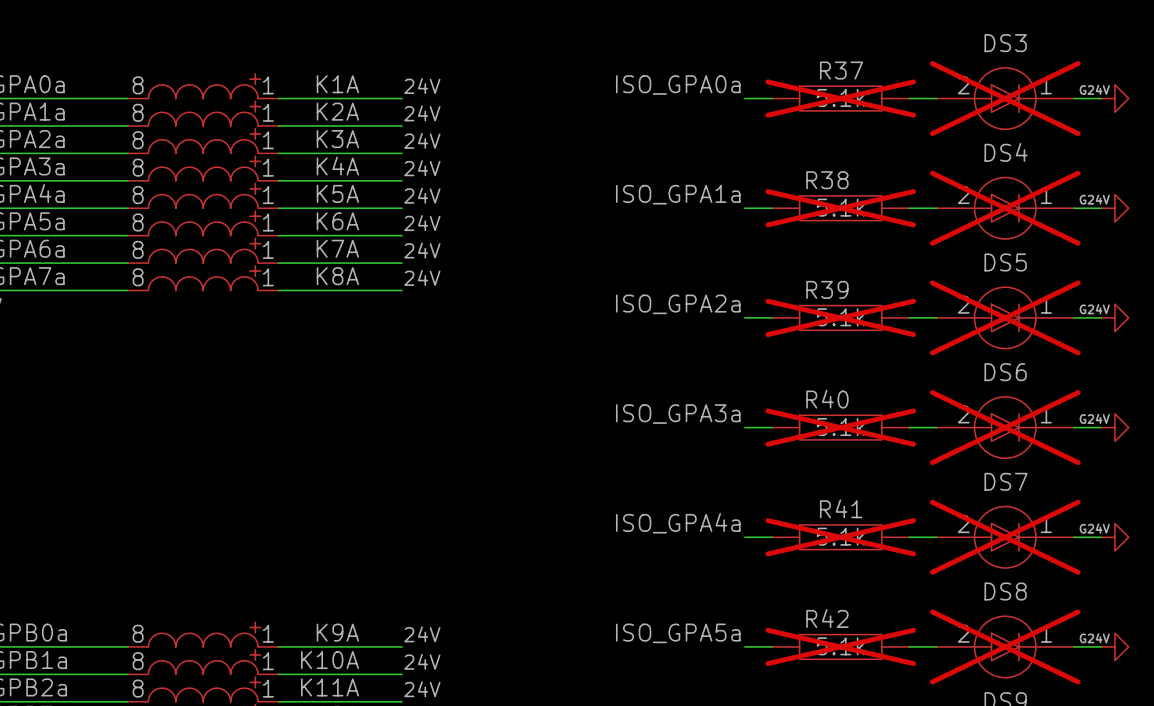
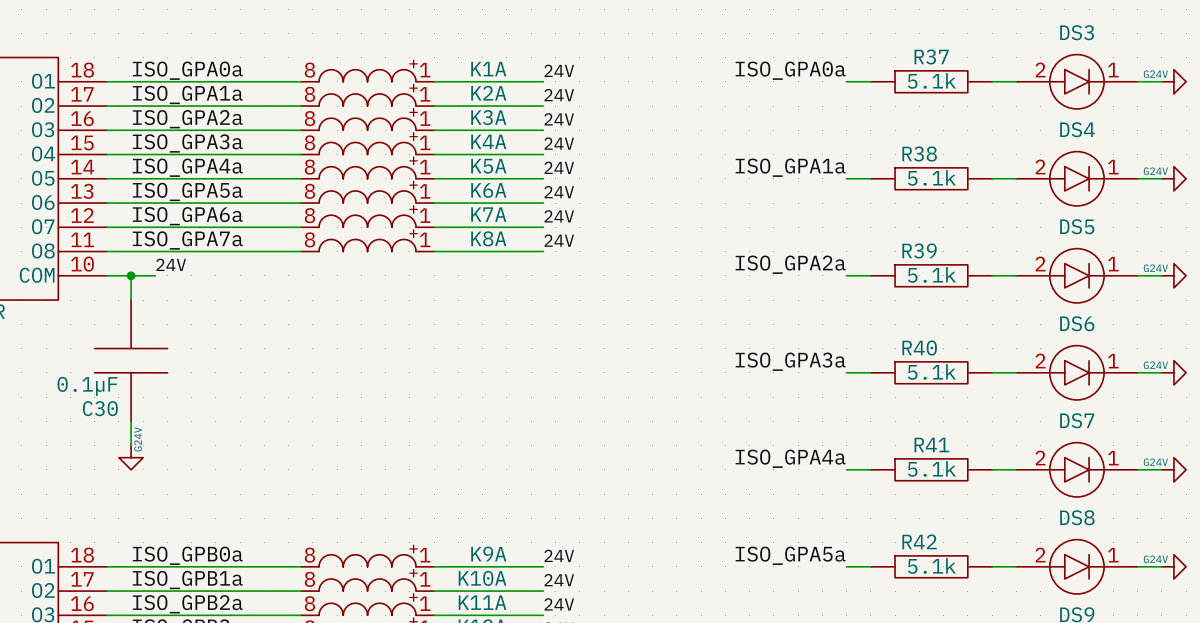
R37 do-not-place cross: (840, 98) -> none
DS3 do-not-place cross: (1005, 98) -> none
R38 do-not-place cross: (840, 208) -> none
DS4 do-not-place cross: (1005, 208) -> none
R39 do-not-place cross: (840, 317) -> none
DS5 do-not-place cross: (1005, 317) -> none
R40 do-not-place cross: (840, 427) -> none
DS6 do-not-place cross: (1005, 427) -> none
R41 do-not-place cross: (840, 537) -> none
DS7 do-not-place cross: (1005, 537) -> none
R42 do-not-place cross: (840, 646) -> none
DS8 do-not-place cross: (1005, 646) -> none

